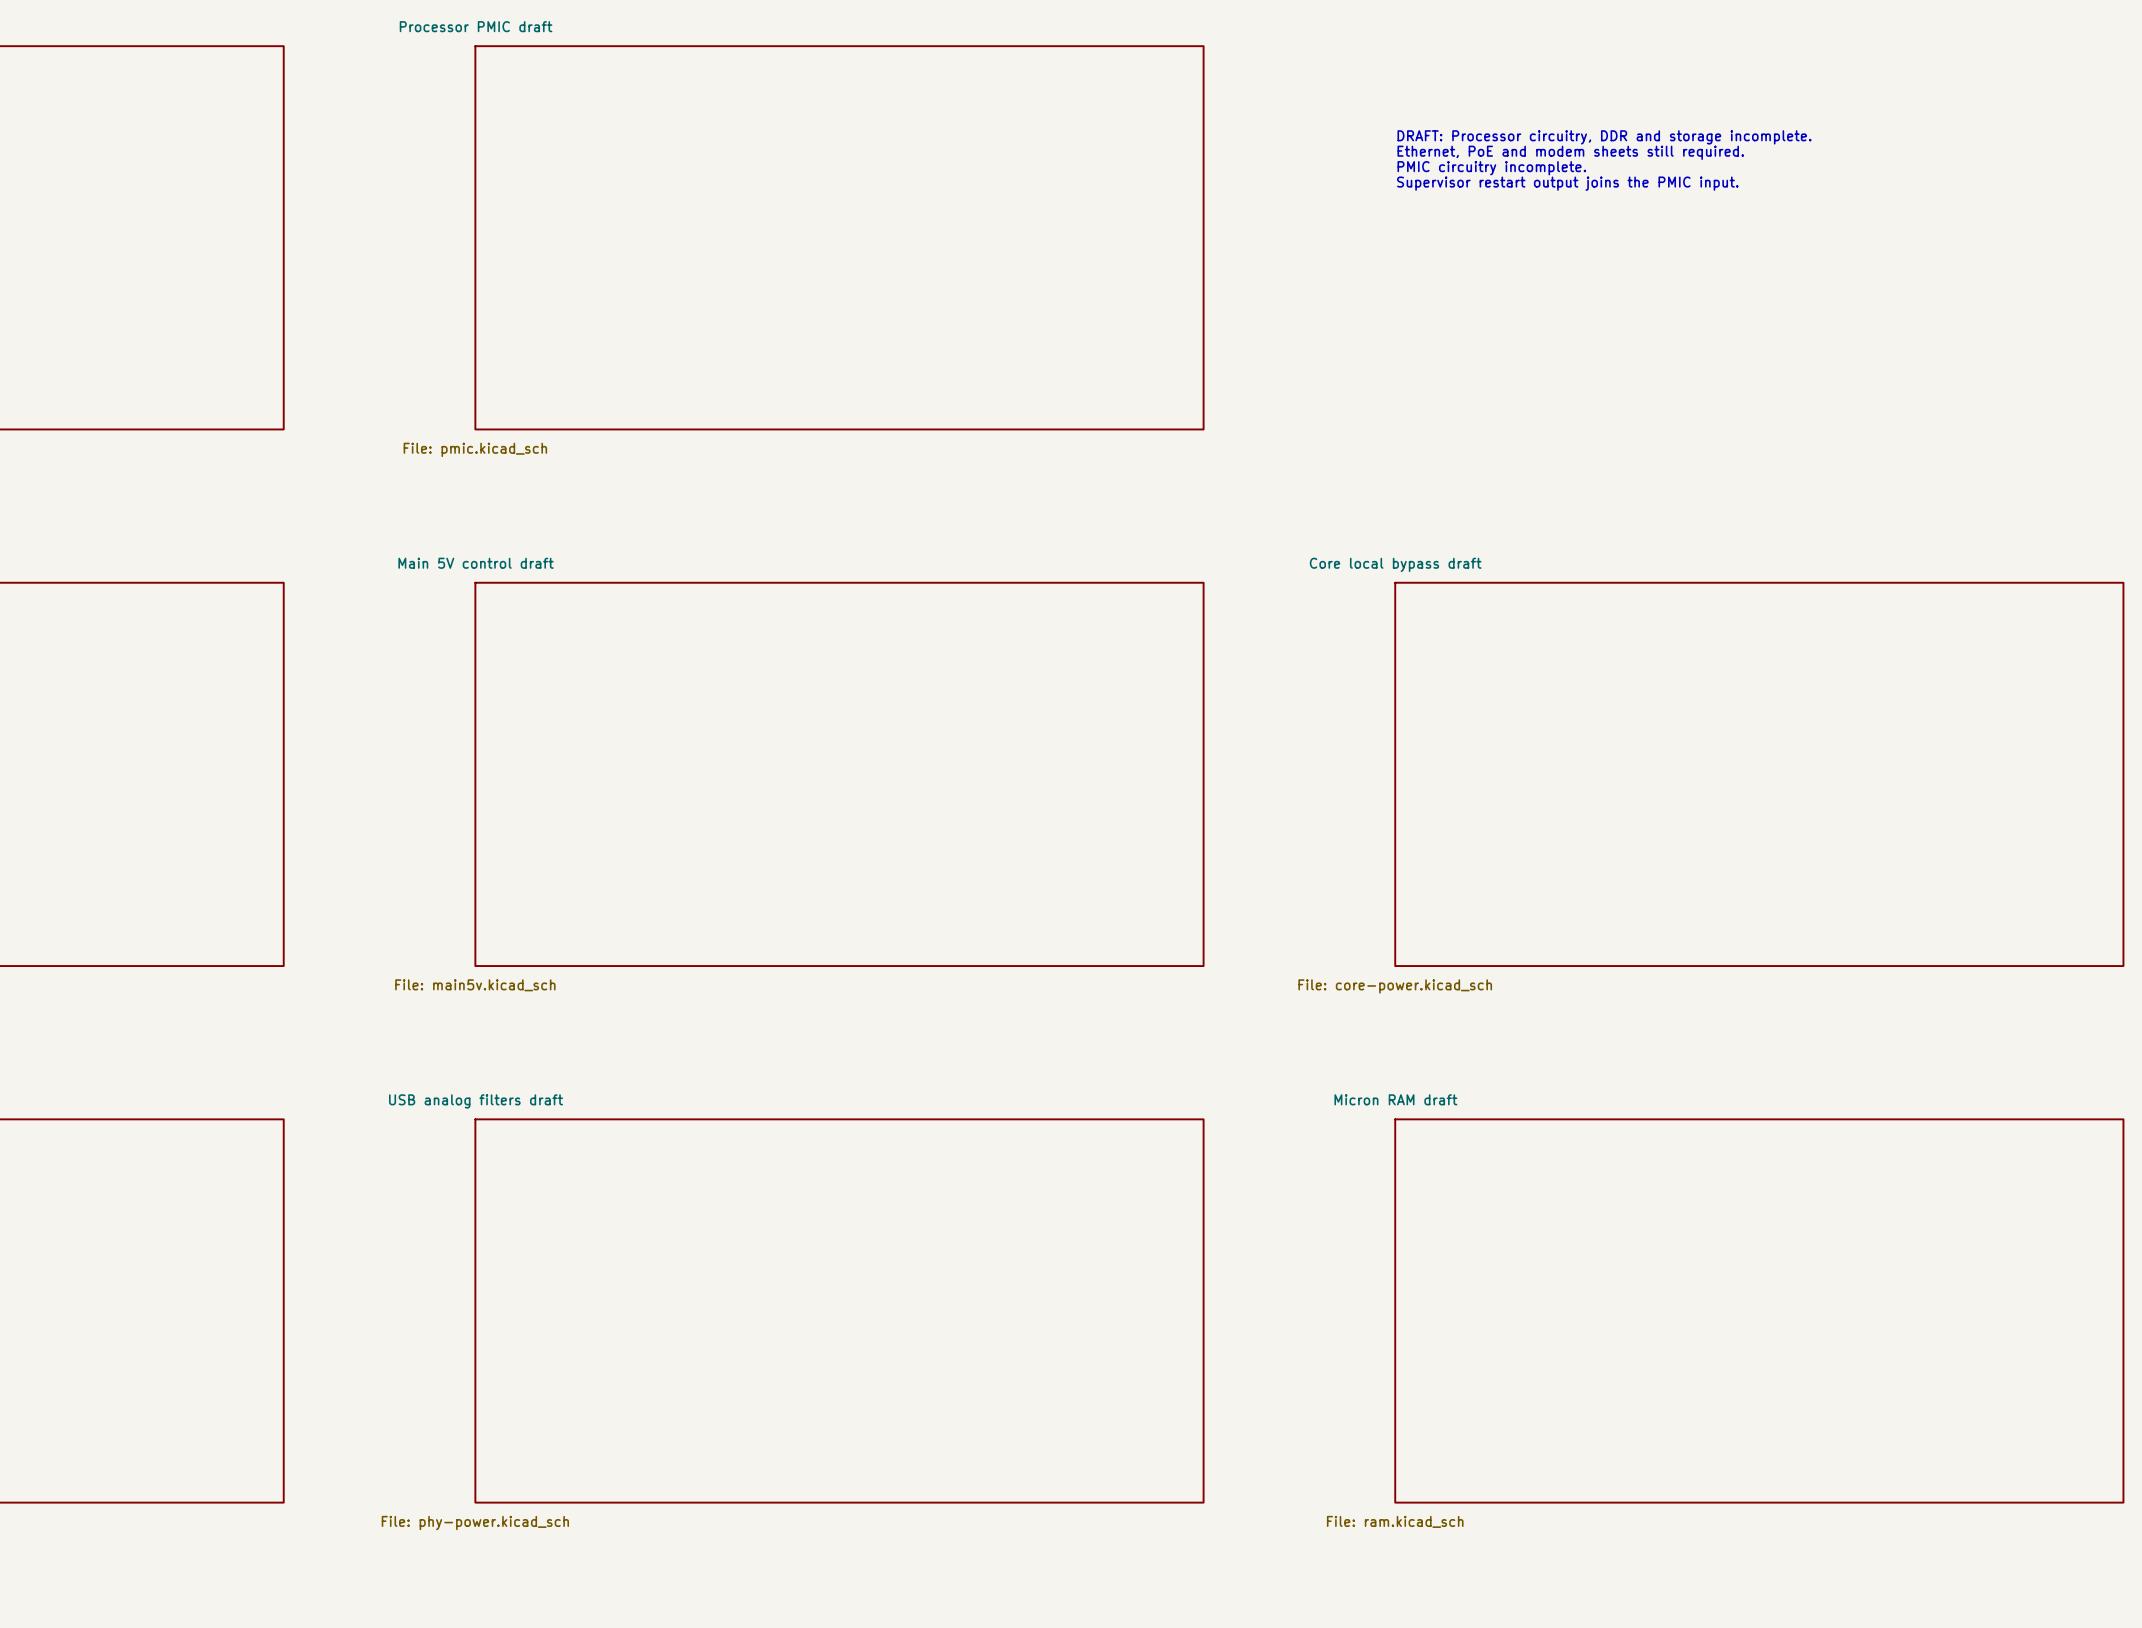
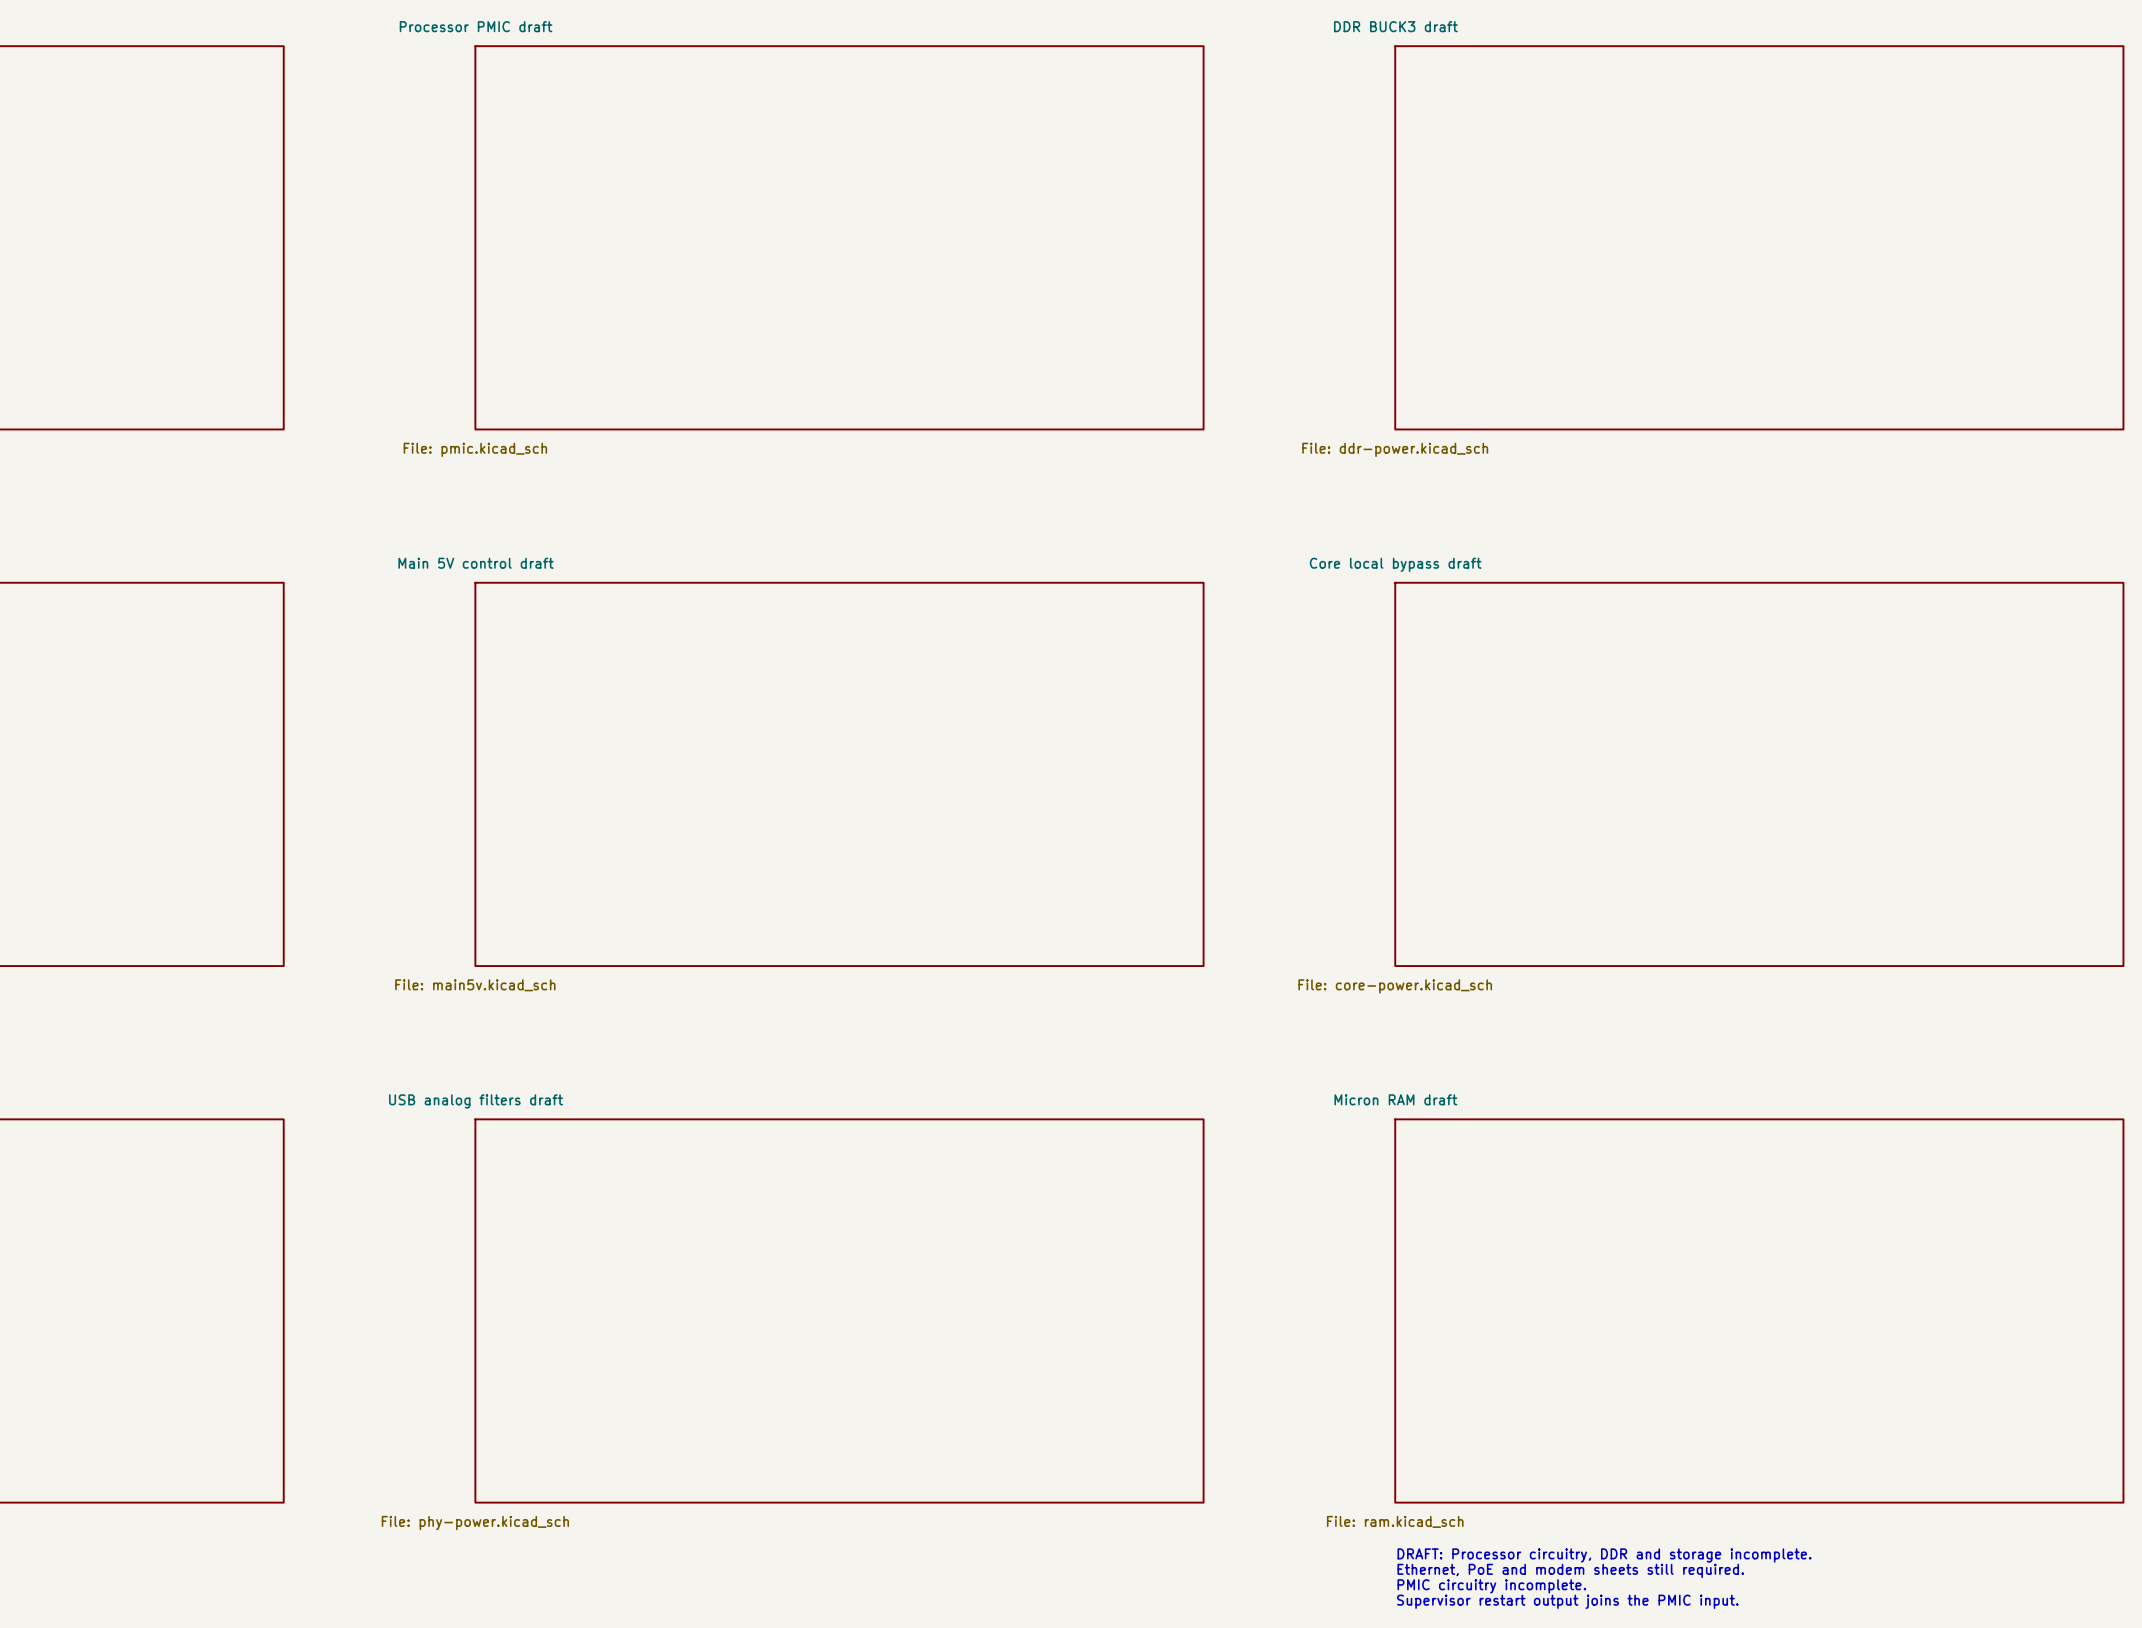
text: DRAFT: Processor circuitry, DDR and storage incomplete. (1604, 137) -> none
text: Ethernet, PoE and modem sheets still required. (1570, 152) -> none
text: PMIC circuitry incomplete. (1491, 168) -> none
text: Supervisor restart output joins the PMIC input. (1567, 183) -> none
sheet DDR BUCK3 draft: none -> File: ddr-power.kicad_sch (1759, 237)
text: none -> DRAFT: Processor circuitry, DDR and storage incomplete. (1604, 1555)
text: none -> Ethernet, PoE and modem sheets still required. (1570, 1570)
text: none -> PMIC circuitry incomplete. (1491, 1586)
text: none -> Supervisor restart output joins the PMIC input. (1567, 1601)

